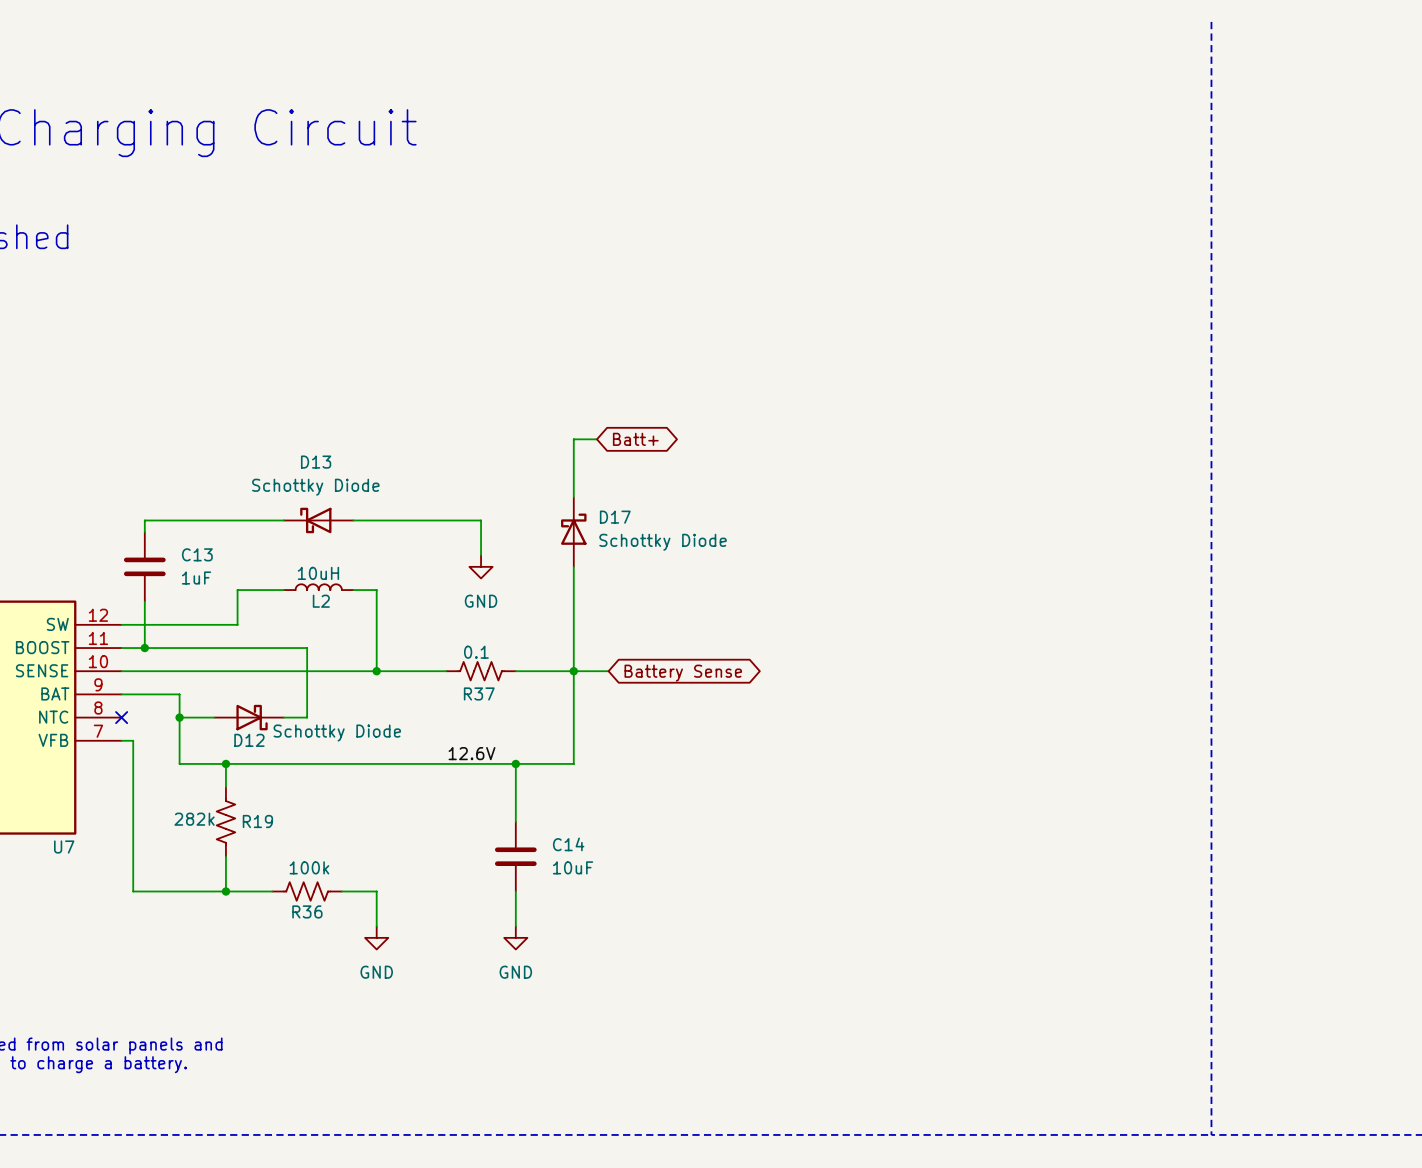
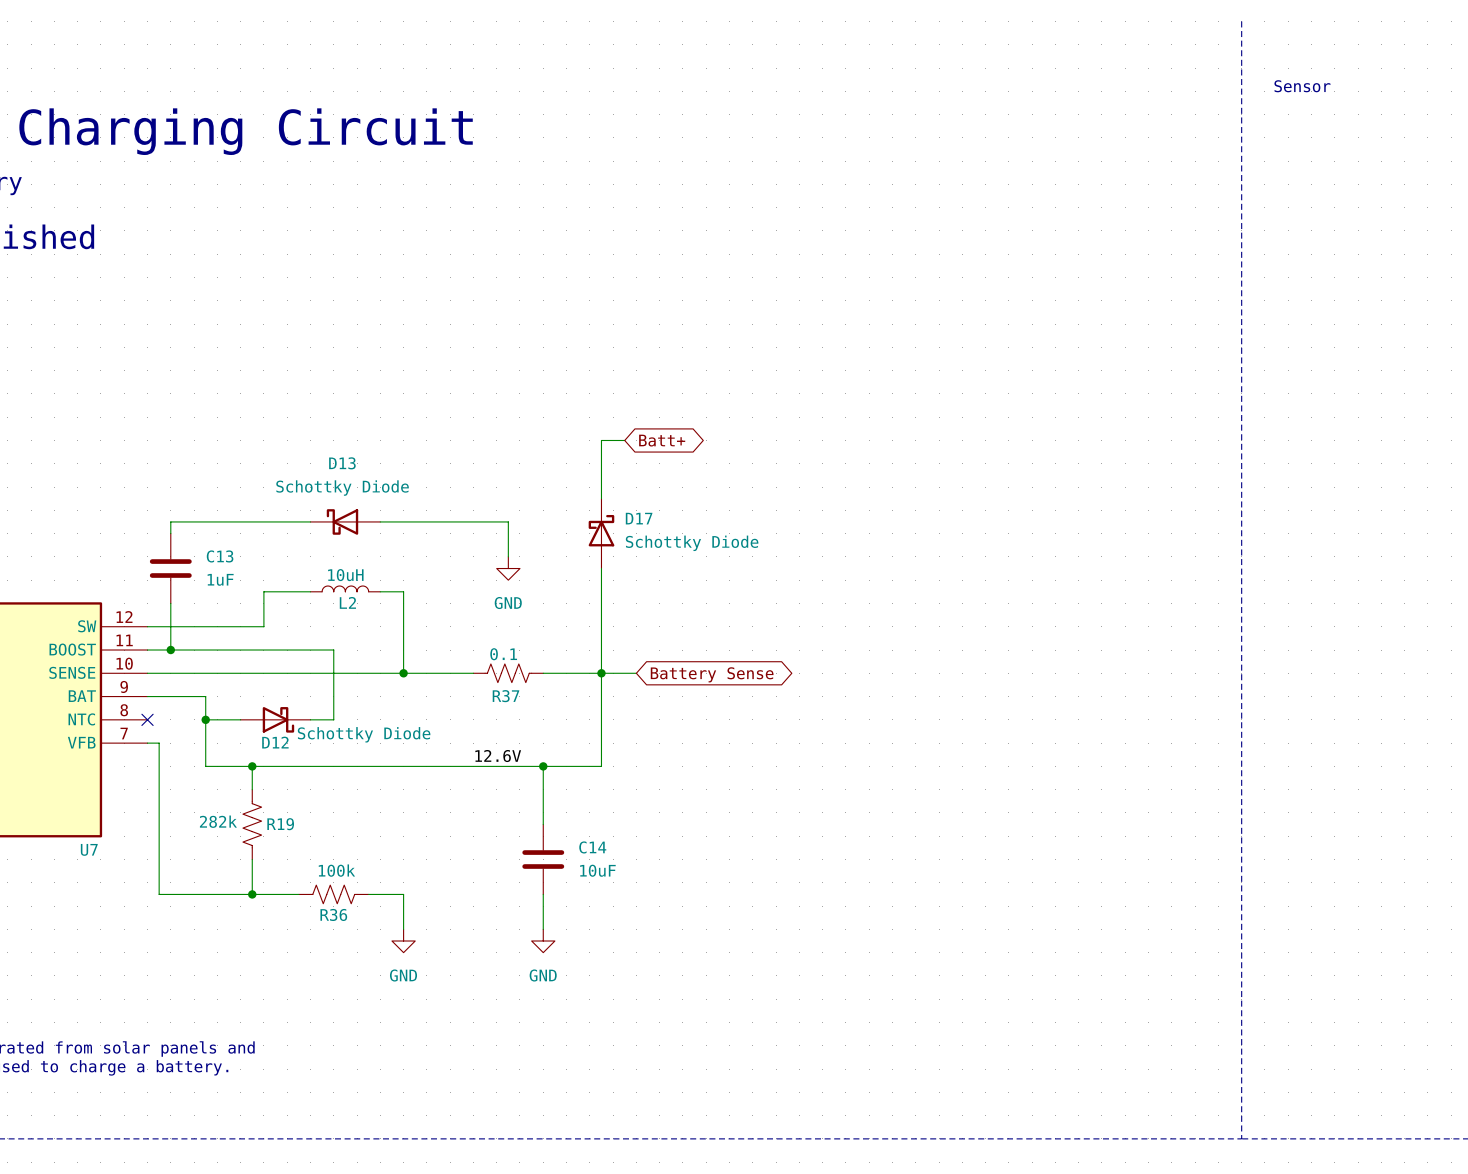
text: none -> Sensor (1302, 86)

